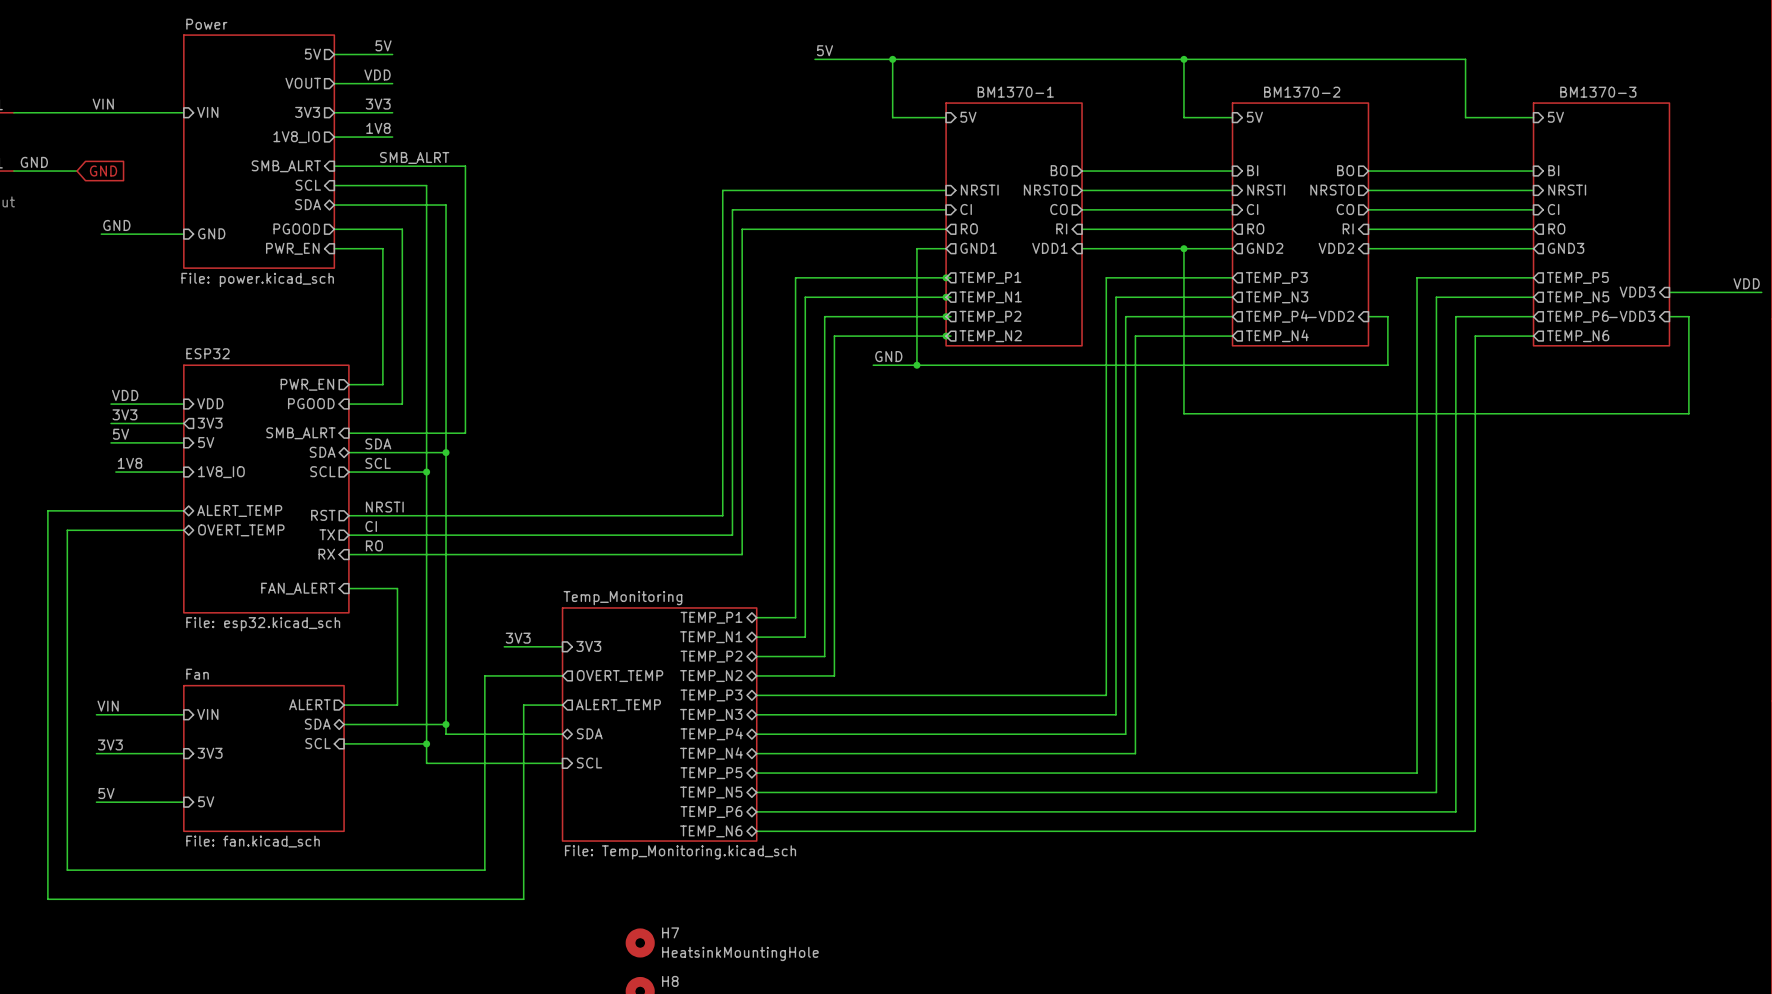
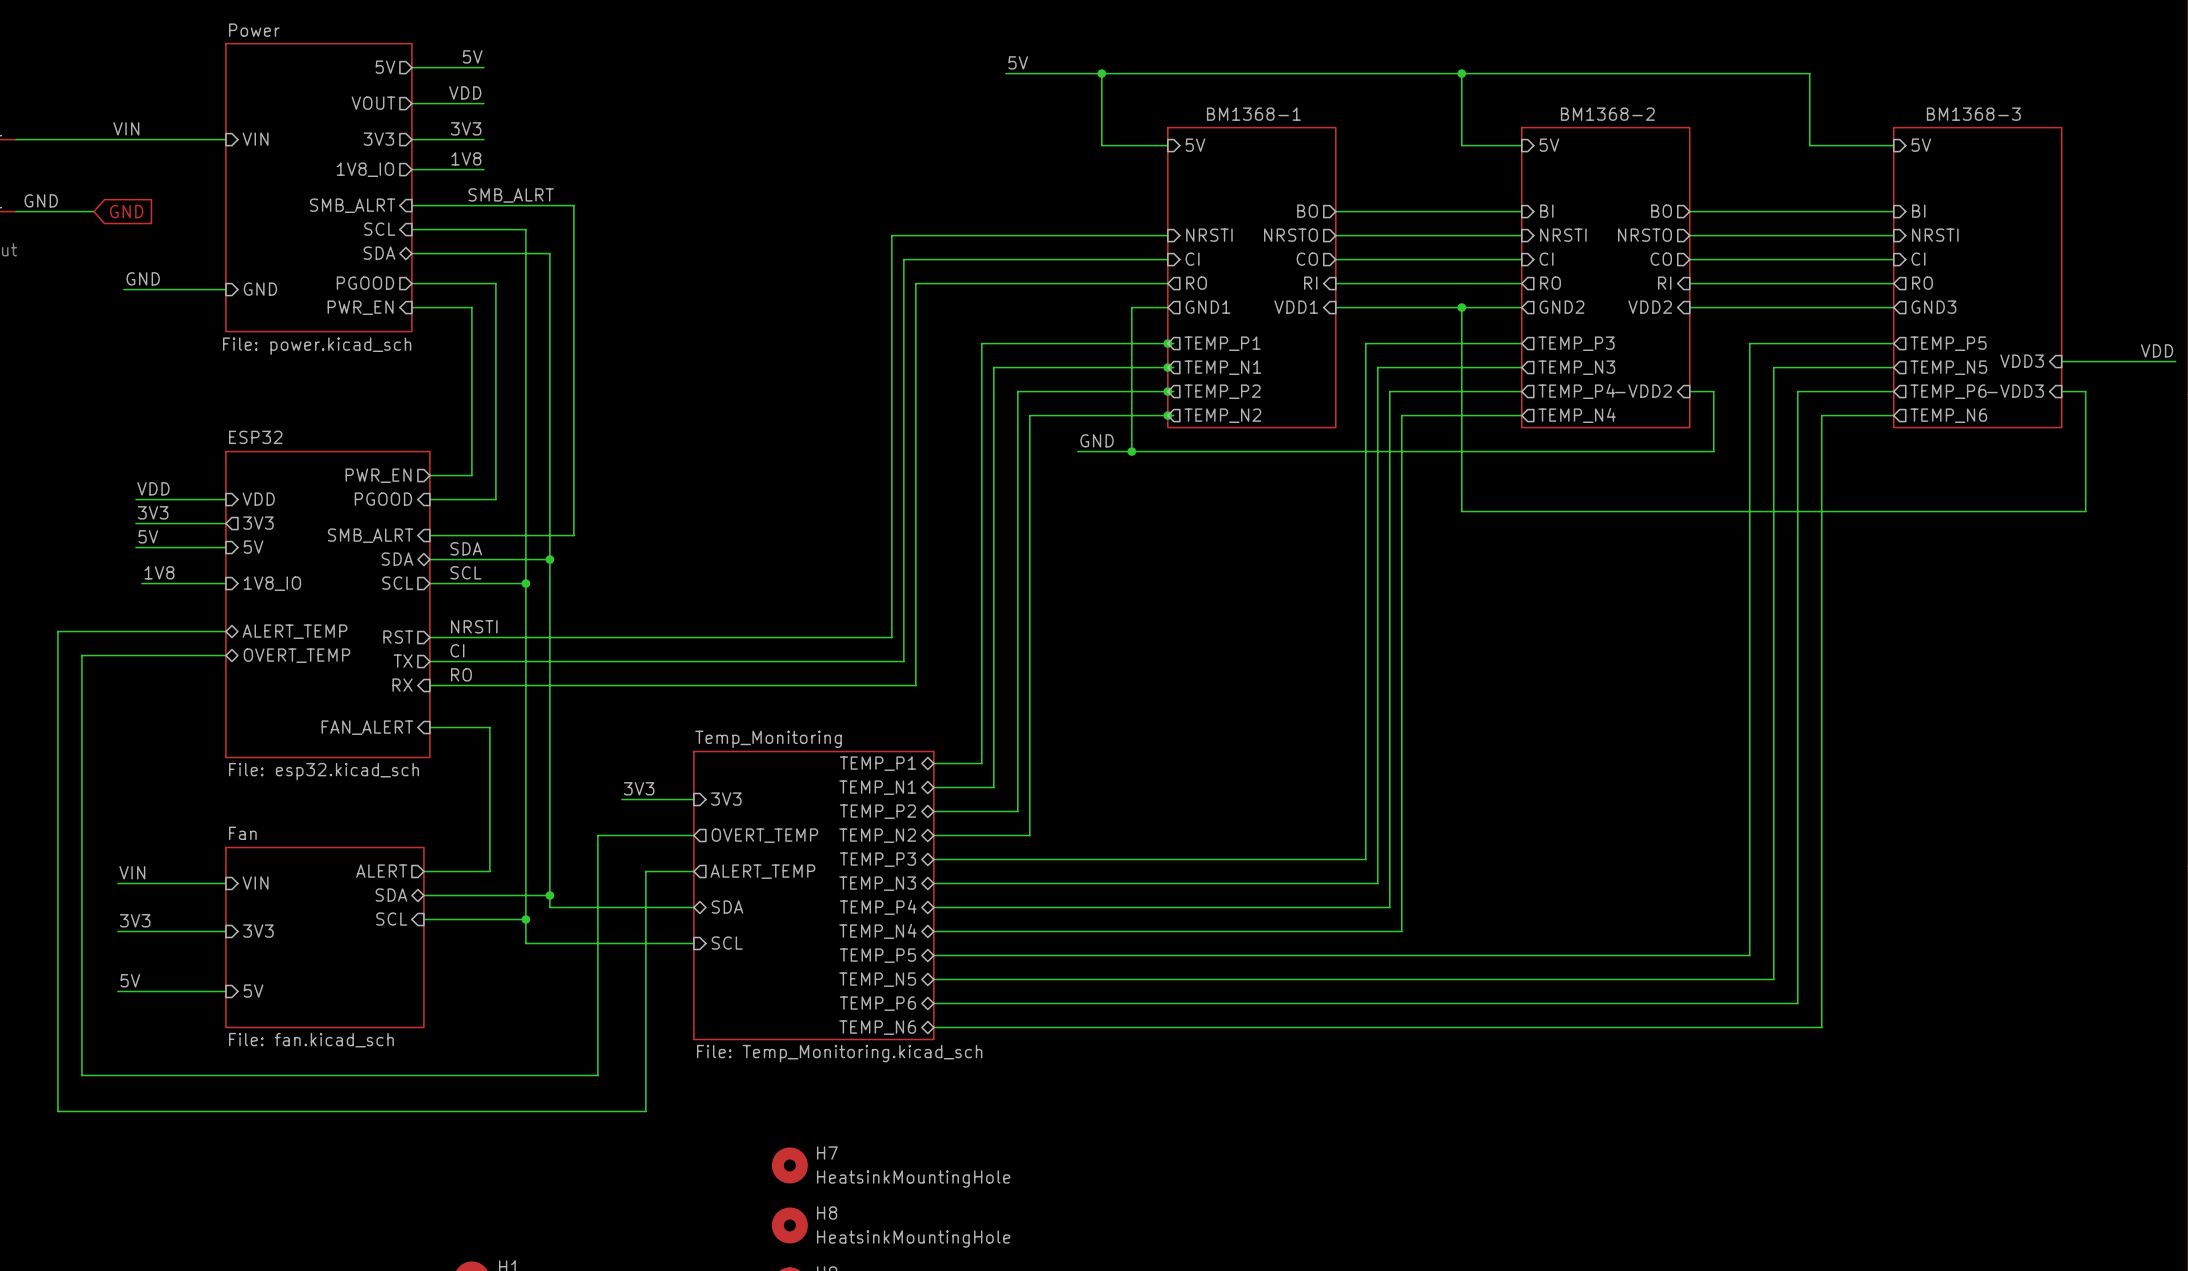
sheet BM1370-1 name: BM1370-1 (1015, 92) -> BM1368-1 (1253, 114)
sheet BM1370-2 name: BM1370-2 (1302, 92) -> BM1368-2 (1607, 114)
sheet BM1370-3 name: BM1370-3 (1598, 92) -> BM1368-3 (1973, 114)

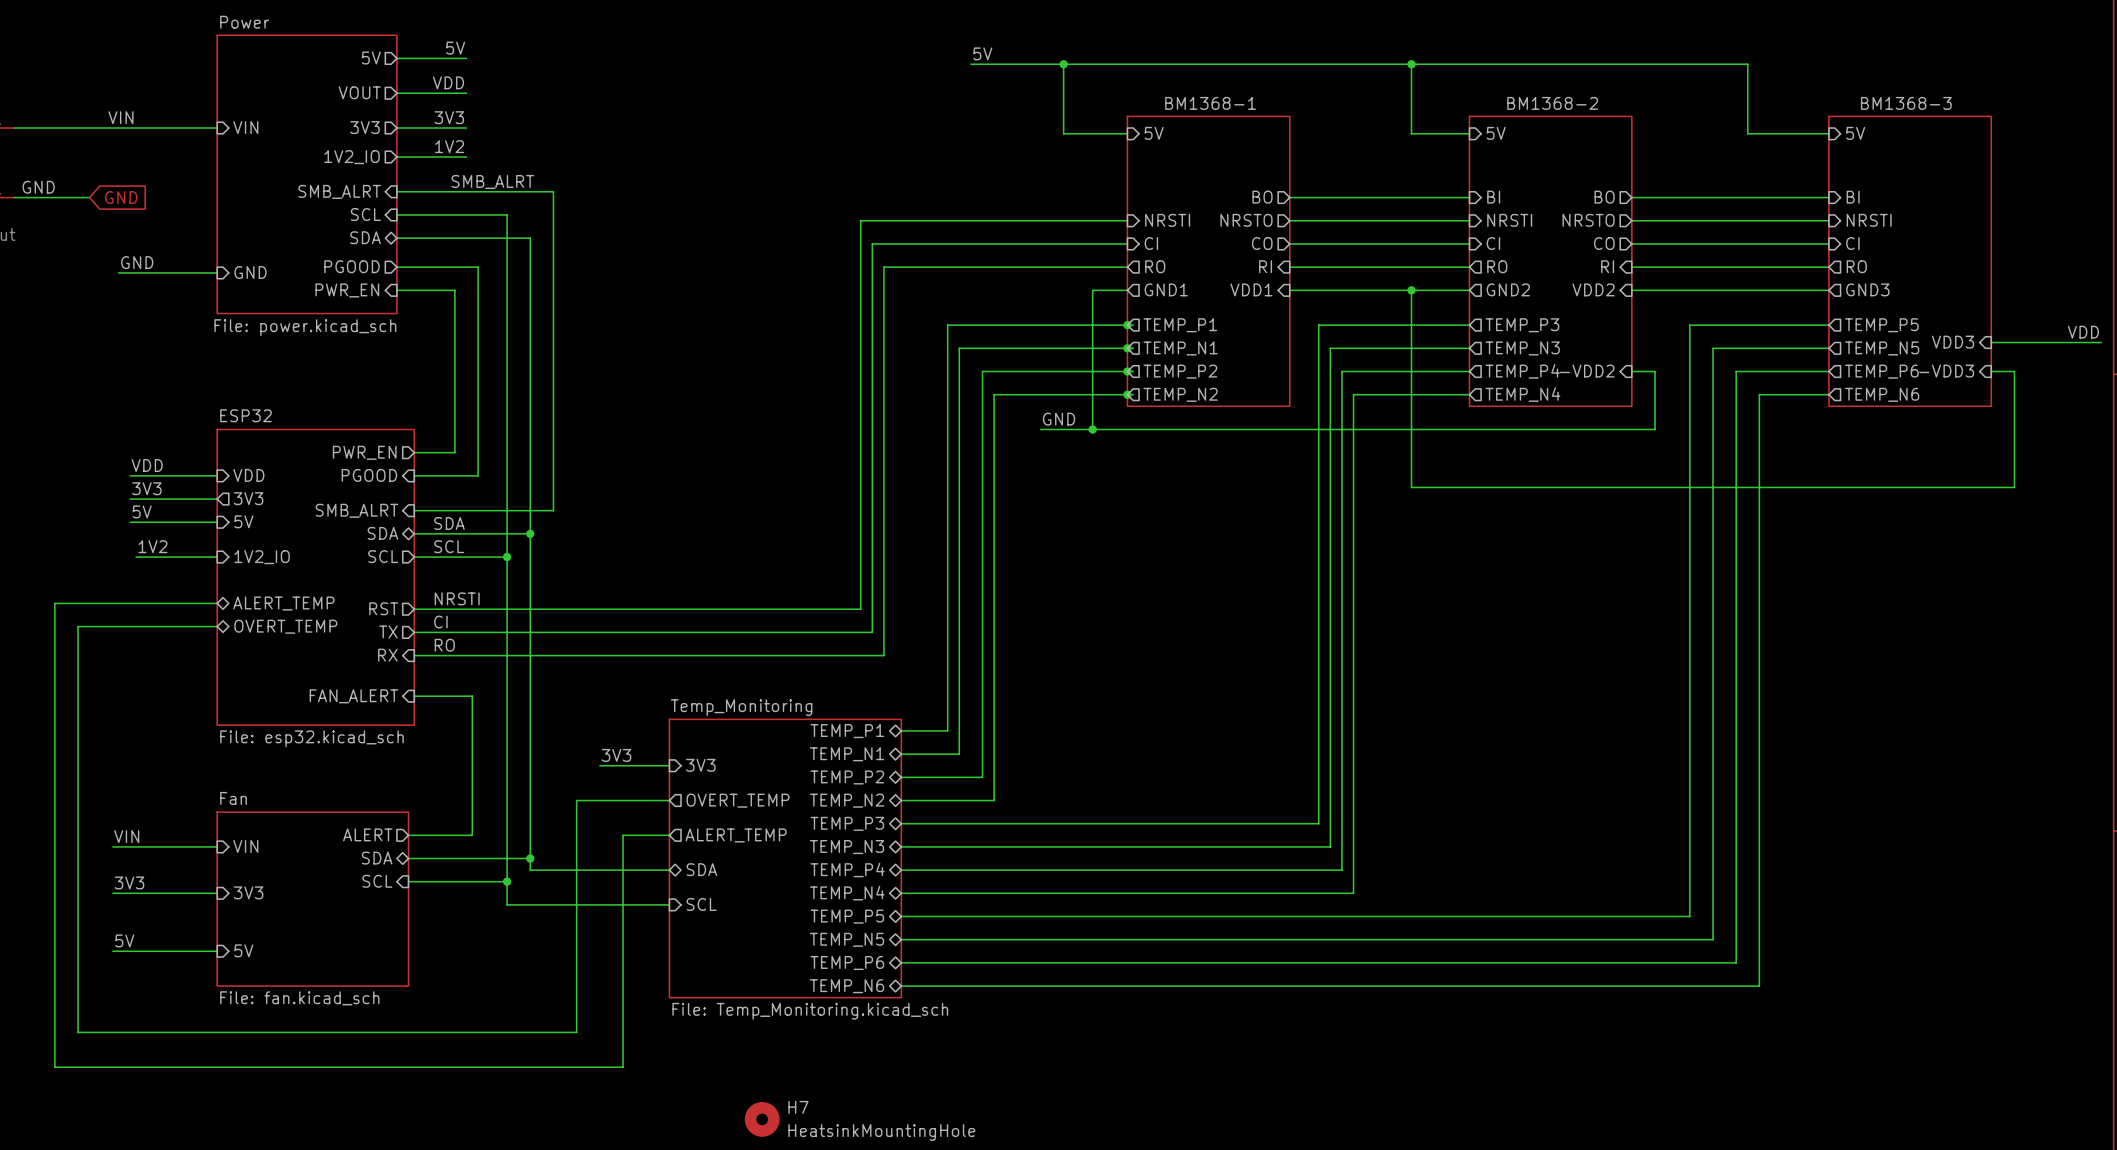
label: 1V8 (466, 158) -> 1V2 (449, 146)
sheet pin: 1V8_IO (365, 169) -> 1V2_IO (352, 157)
label: 1V8 (159, 572) -> 1V2 (152, 546)
sheet pin: 1V8_IO (272, 583) -> 1V2_IO (262, 557)

